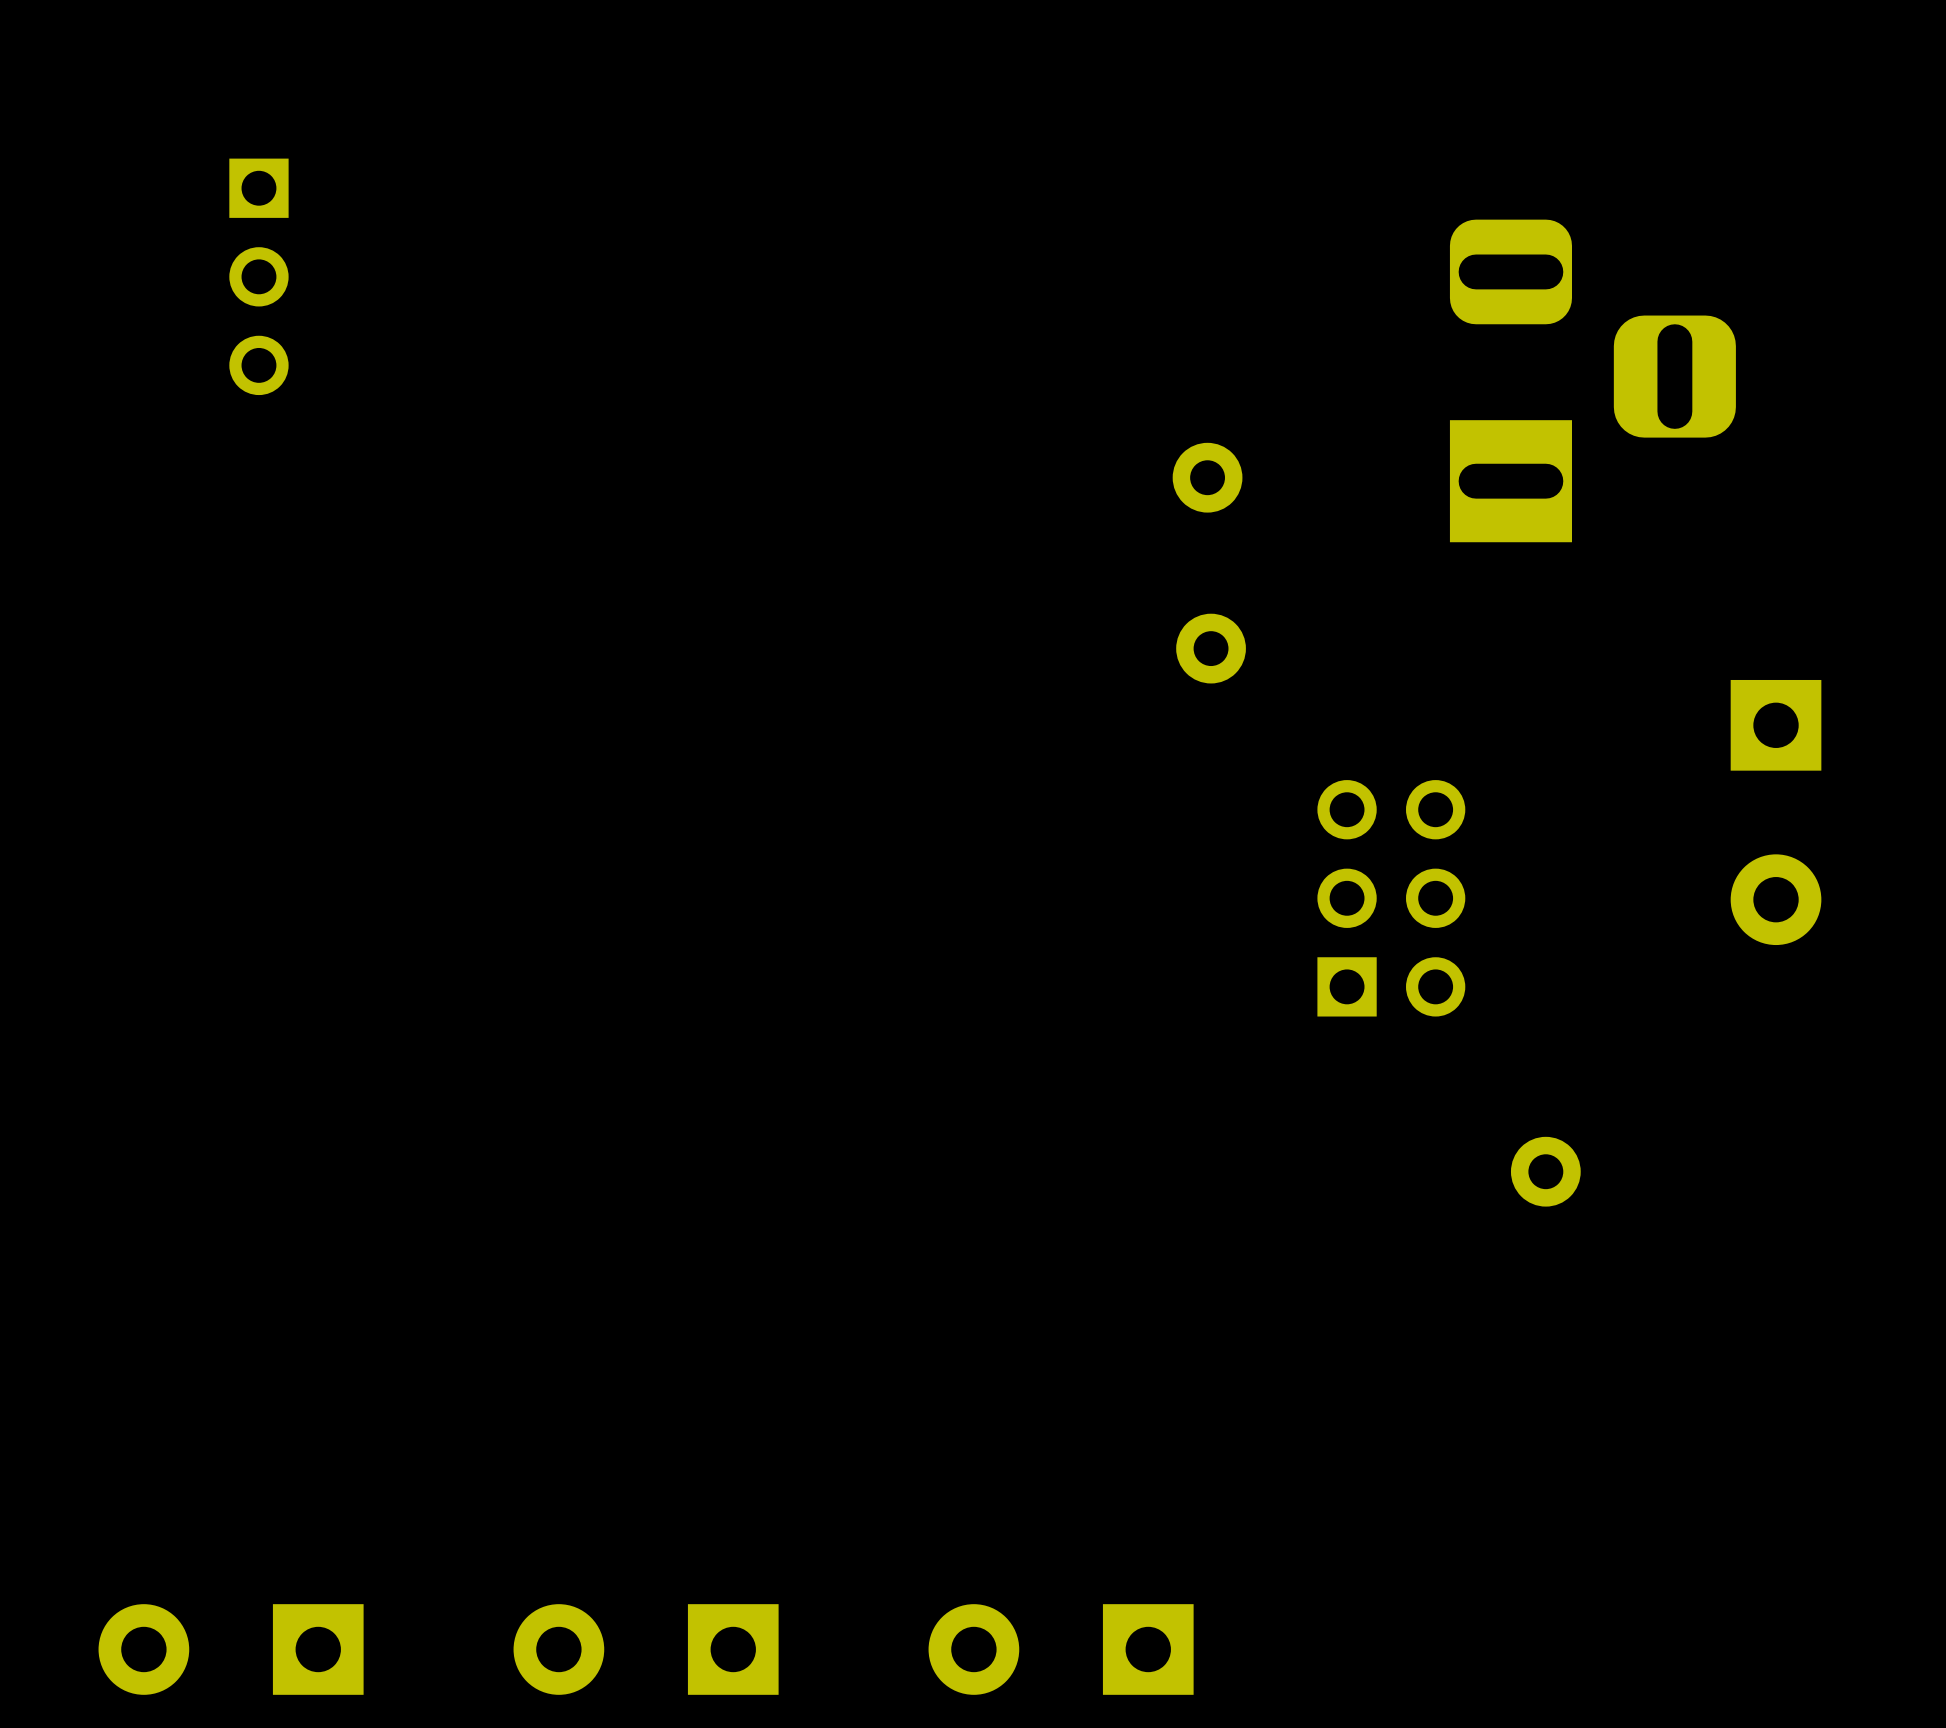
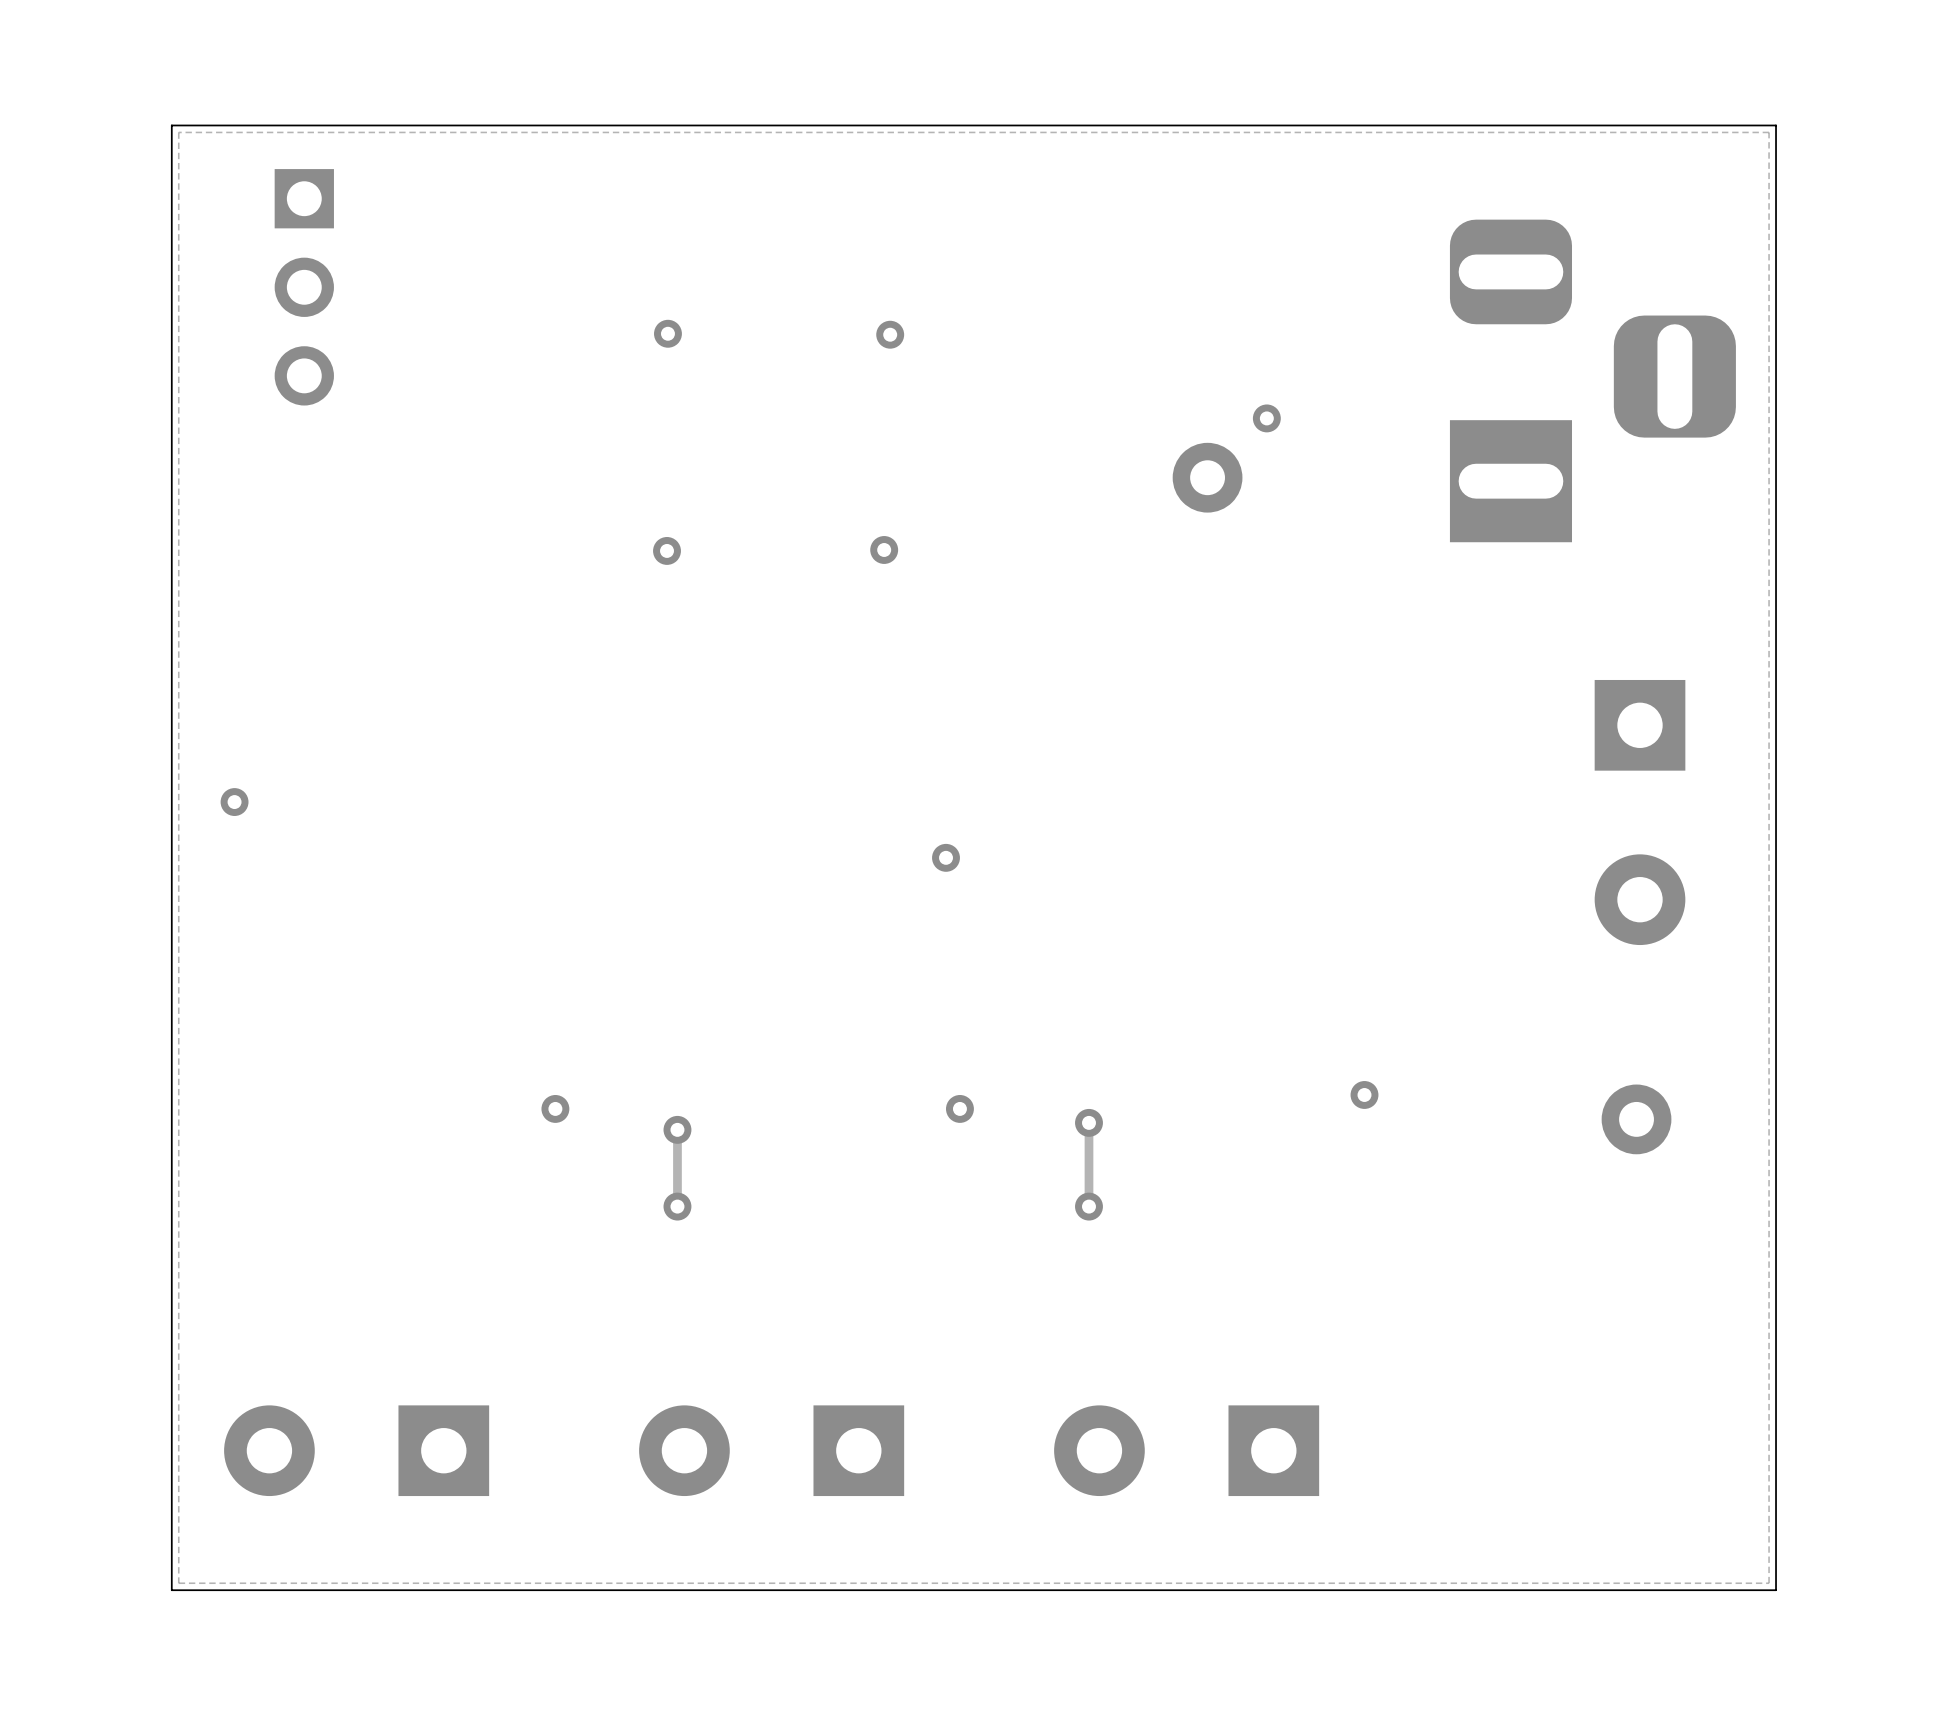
board edge: none -> (1776, 125) (1776, 1590) (171, 1590) (171, 125) (1776, 125)
zone outline: none -> (1769, 132) (1769, 1583) (178, 1583) (178, 132) (1769, 132)
part position: (258, 276) -> (304, 287)
via: none -> (667, 333)
via: none -> (890, 334)
via: none -> (1266, 418)
via: none -> (884, 549)
via: none -> (667, 550)
part: (1211, 648) -> none
via: none -> (234, 802)
part position: (1776, 812) -> (1640, 812)
via: none -> (946, 857)
part: (1391, 898) -> none
via: none -> (1364, 1094)
via: none -> (555, 1108)
via: none -> (959, 1108)
track: none -> (1088, 1122) (1088, 1206)
via: none -> (1088, 1122)
track: none -> (677, 1129) (677, 1206)
via: none -> (677, 1129)
part position: (1545, 1171) -> (1636, 1119)
via: none -> (677, 1206)
via: none -> (1088, 1206)
part: none -> (356, 1450)
part: none -> (771, 1450)
part: none -> (1186, 1450)
part: (231, 1649) -> none
part: (646, 1649) -> none
part: (1061, 1649) -> none

